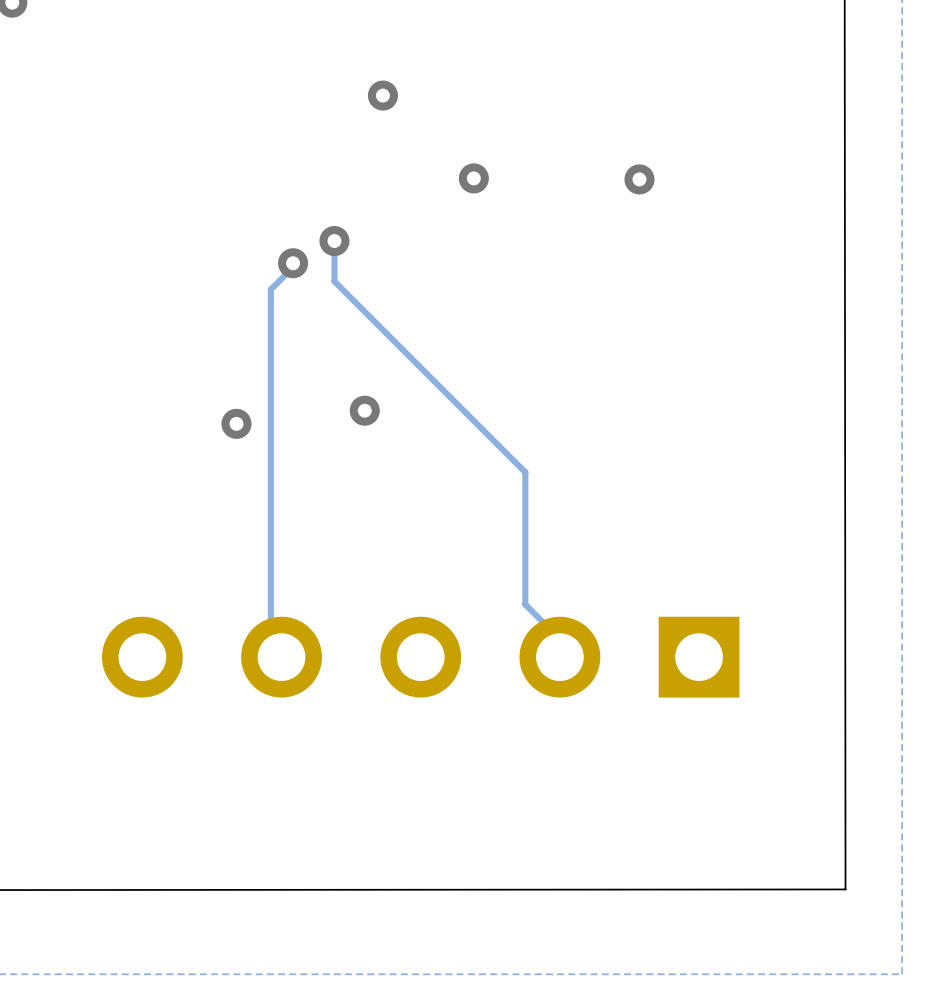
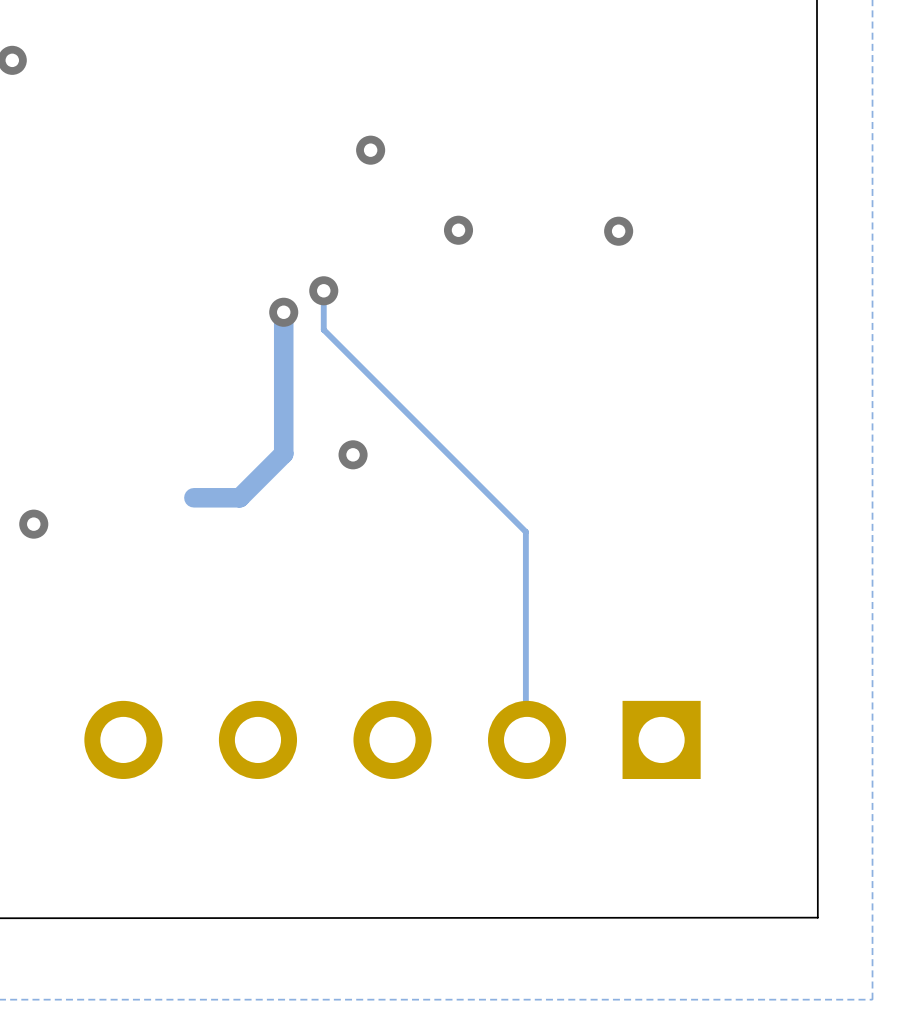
track: (293, 263) (289, 265) (289, 271) (270, 289) (270, 647) (281, 657) -> (283, 312) (283, 453) (239, 497) (193, 497)
via position: (236, 423) -> (33, 524)
track: (525, 472) (525, 604) (555, 634) -> (508, 514) (525, 531) (527, 739)
part position: (420, 657) -> (392, 739)

